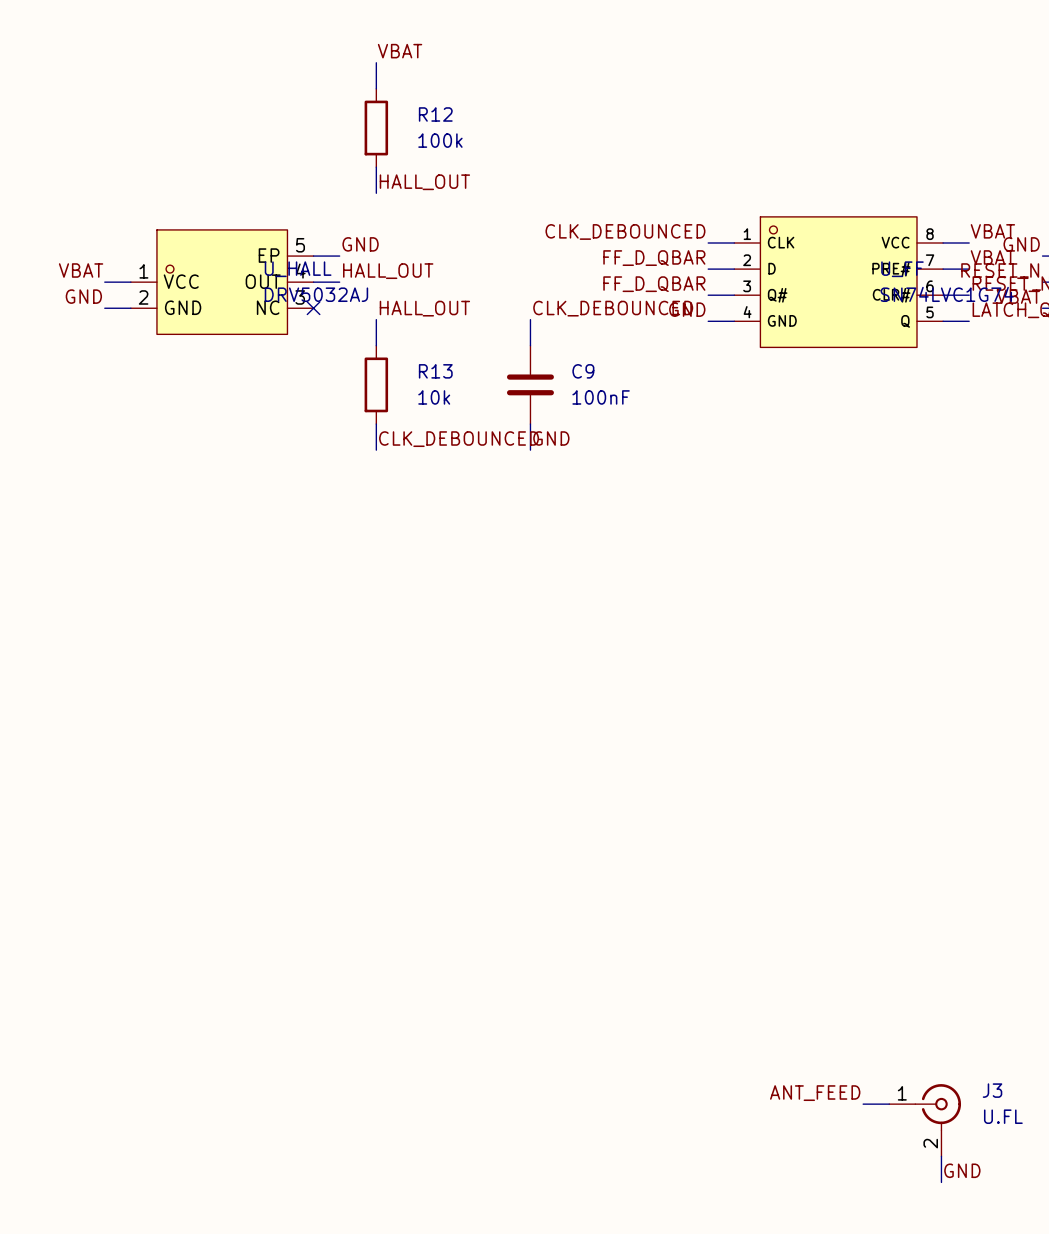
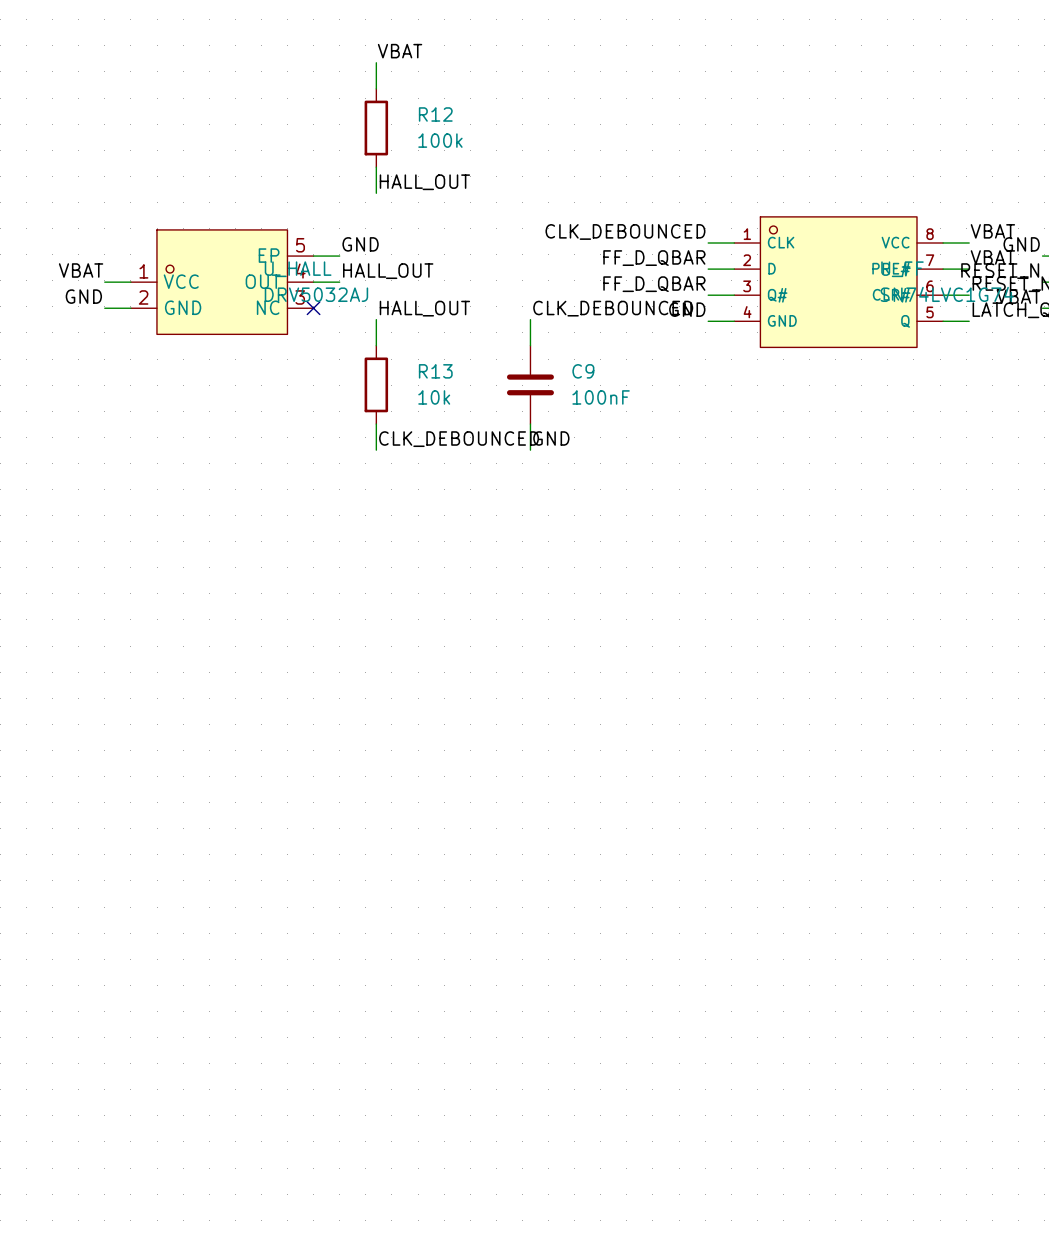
label: ANT_FEED (815, 1093) -> none
wire: (863, 1104) (889, 1104) -> none
J3: U.FL (925, 1120) -> none
wire: (941, 1156) (941, 1182) -> none
label: GND (962, 1170) -> none

